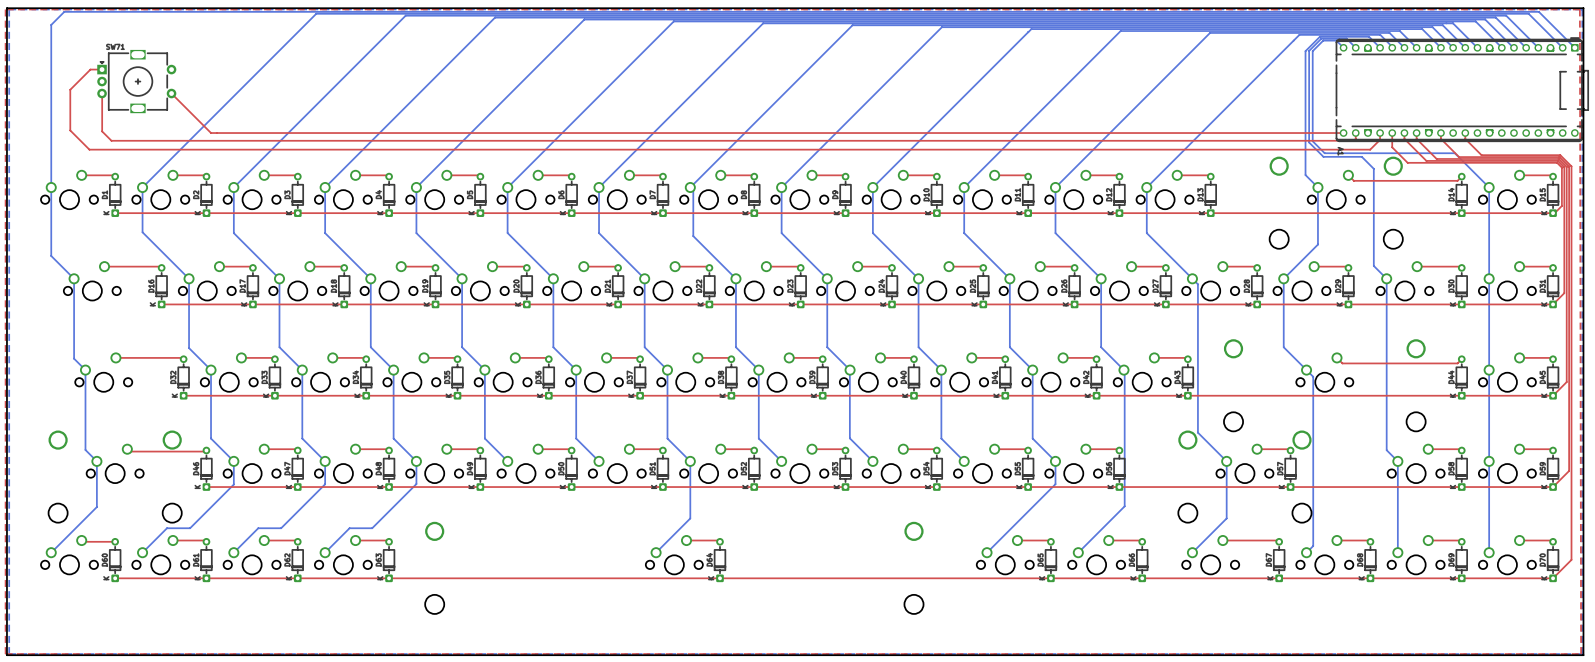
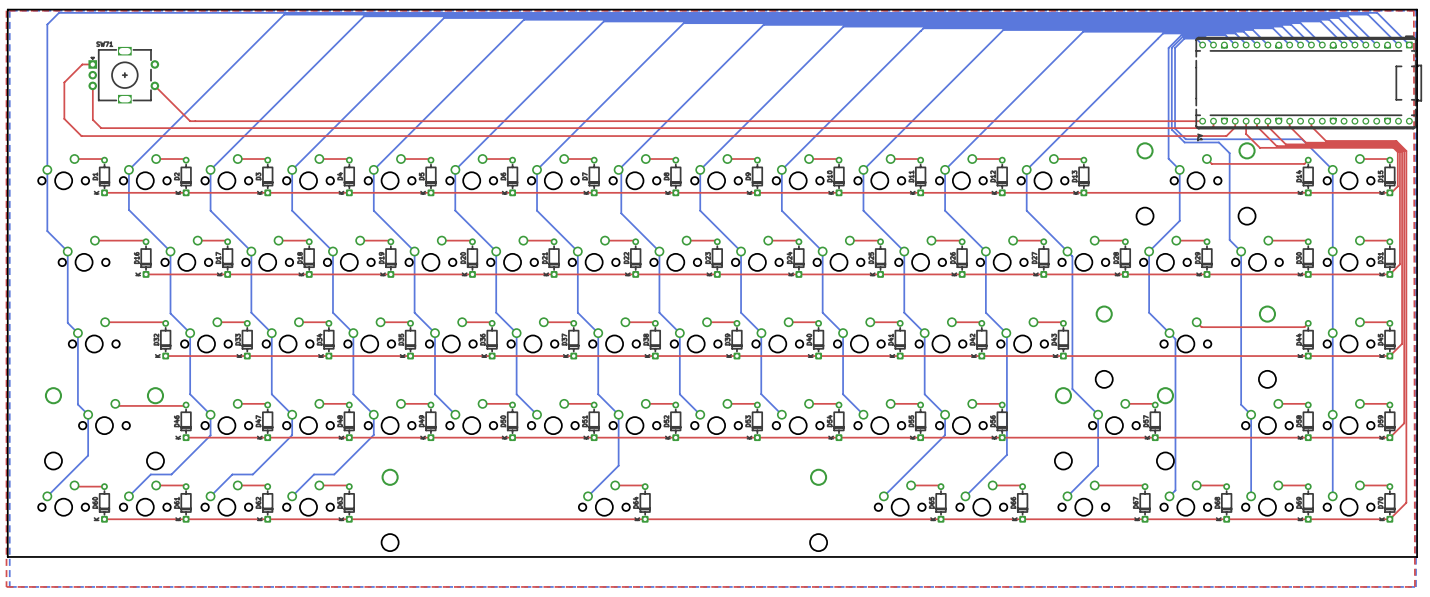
board edge: (6, 620) (6, 655) (1583, 655) (1583, 620) -> (7, 556) (1417, 556)

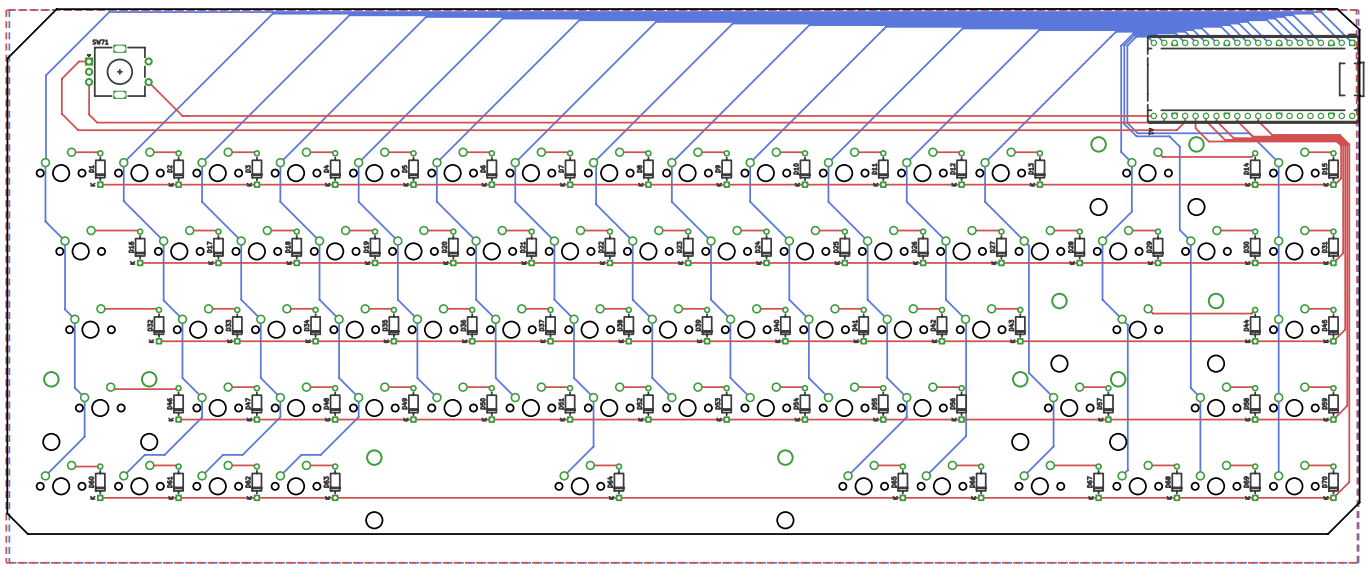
bottom track: (113, 12) (59, 12) (47, 24) (47, 169) -> (109, 12) (45, 75) (45, 162)
board edge: (1417, 31) (1417, 9) (7, 9) (7, 556) (29, 556) -> (1359, 29) (1337, 8) (56, 9) (7, 58) (7, 513) (27, 534)
board edge: (1417, 523) (1417, 556) (1384, 556) -> (1359, 502) (1327, 534)

